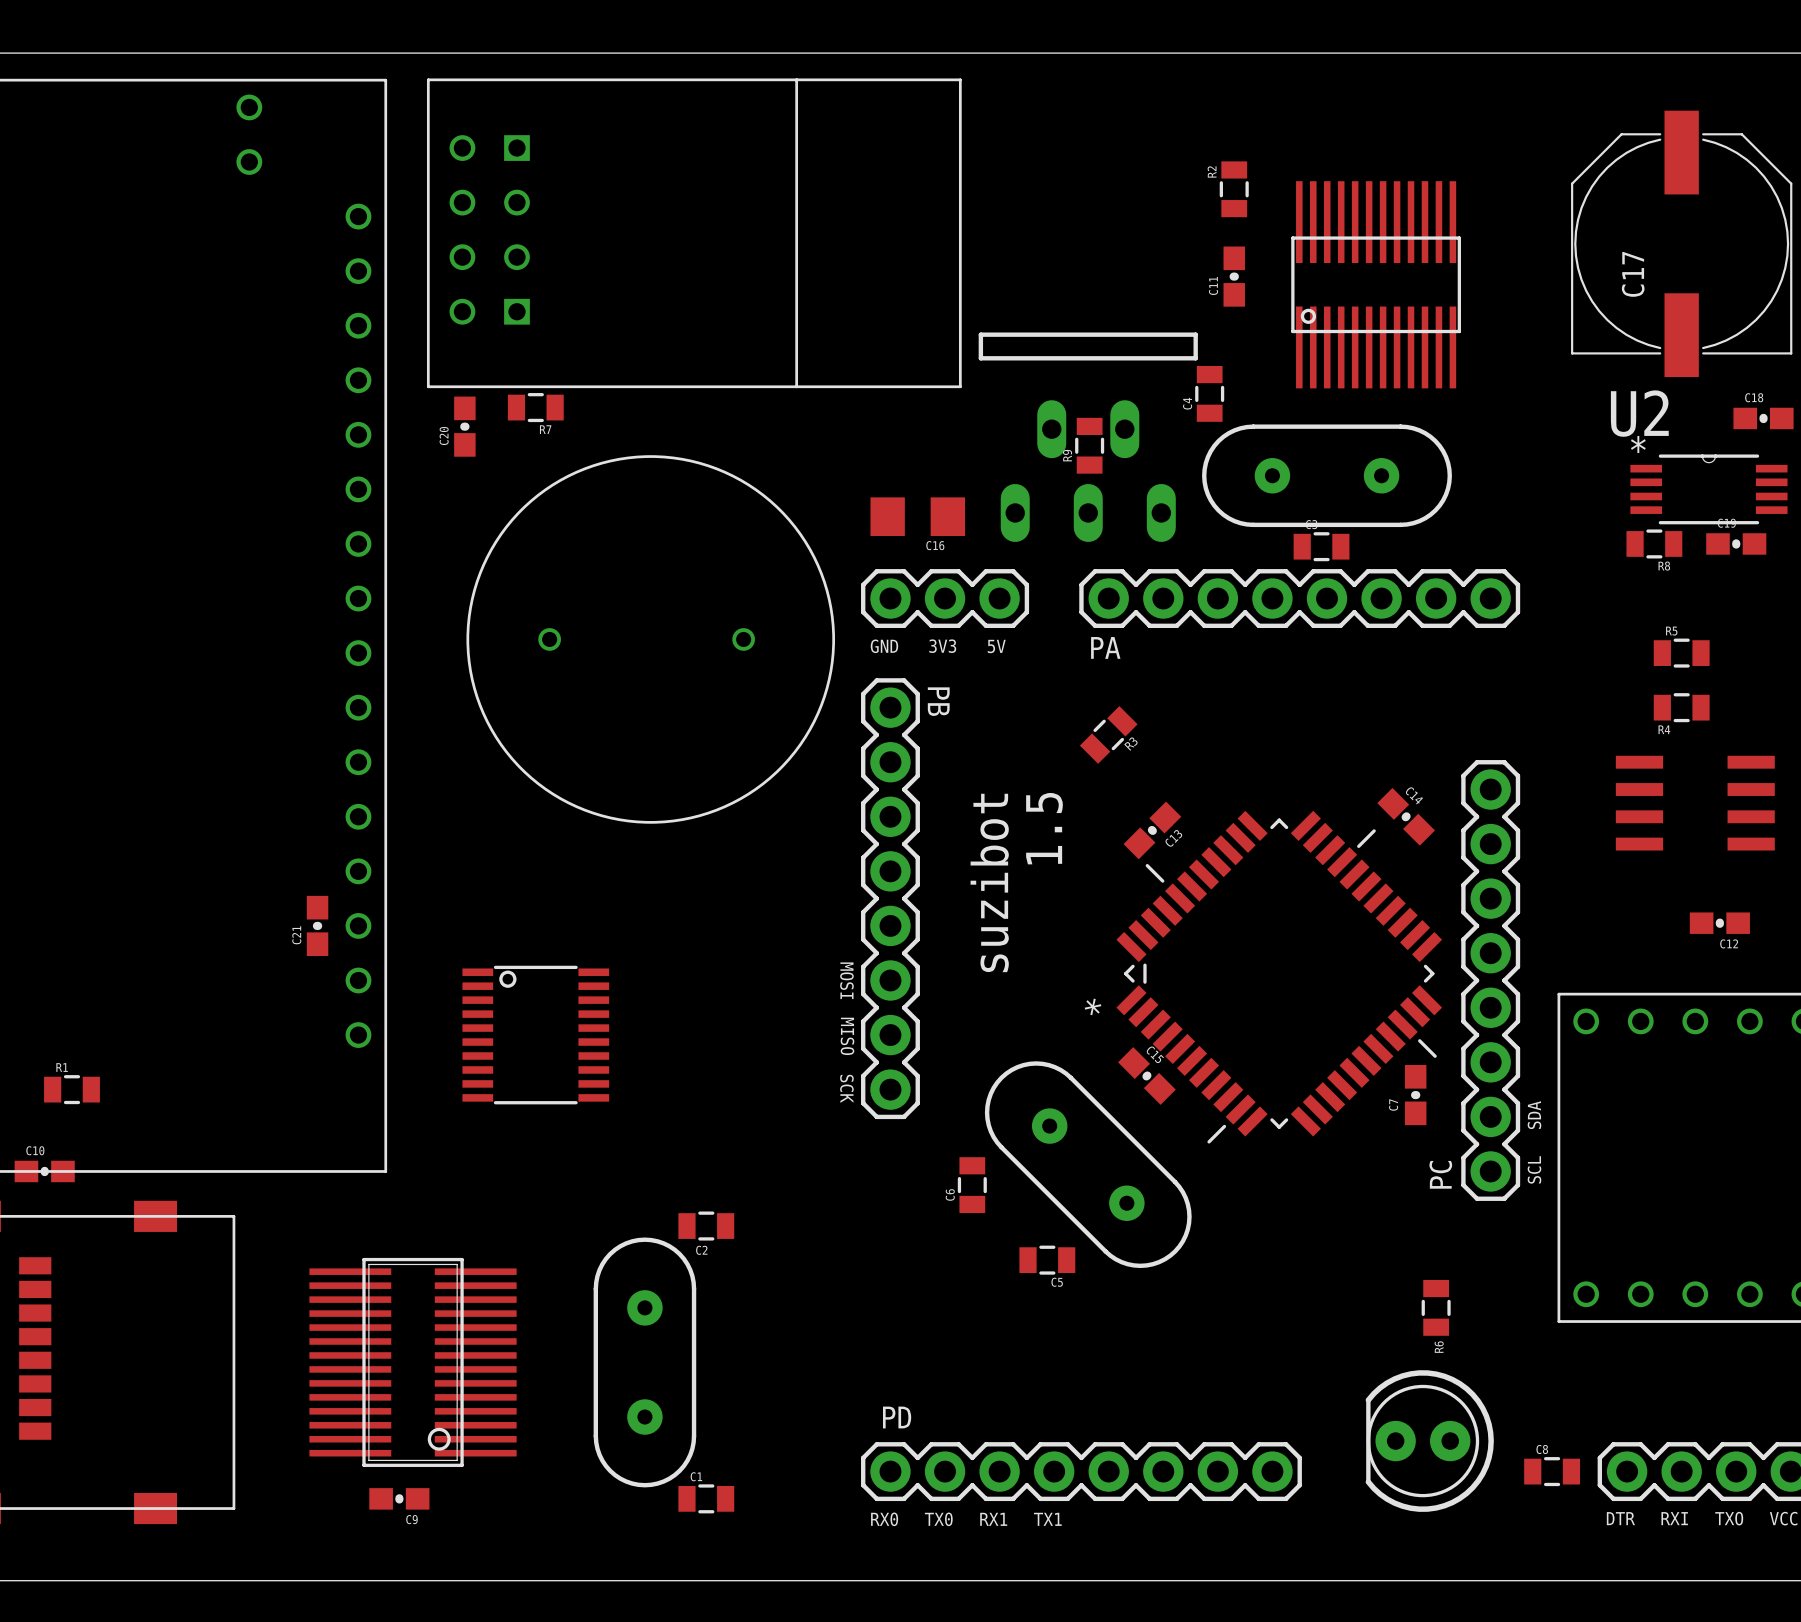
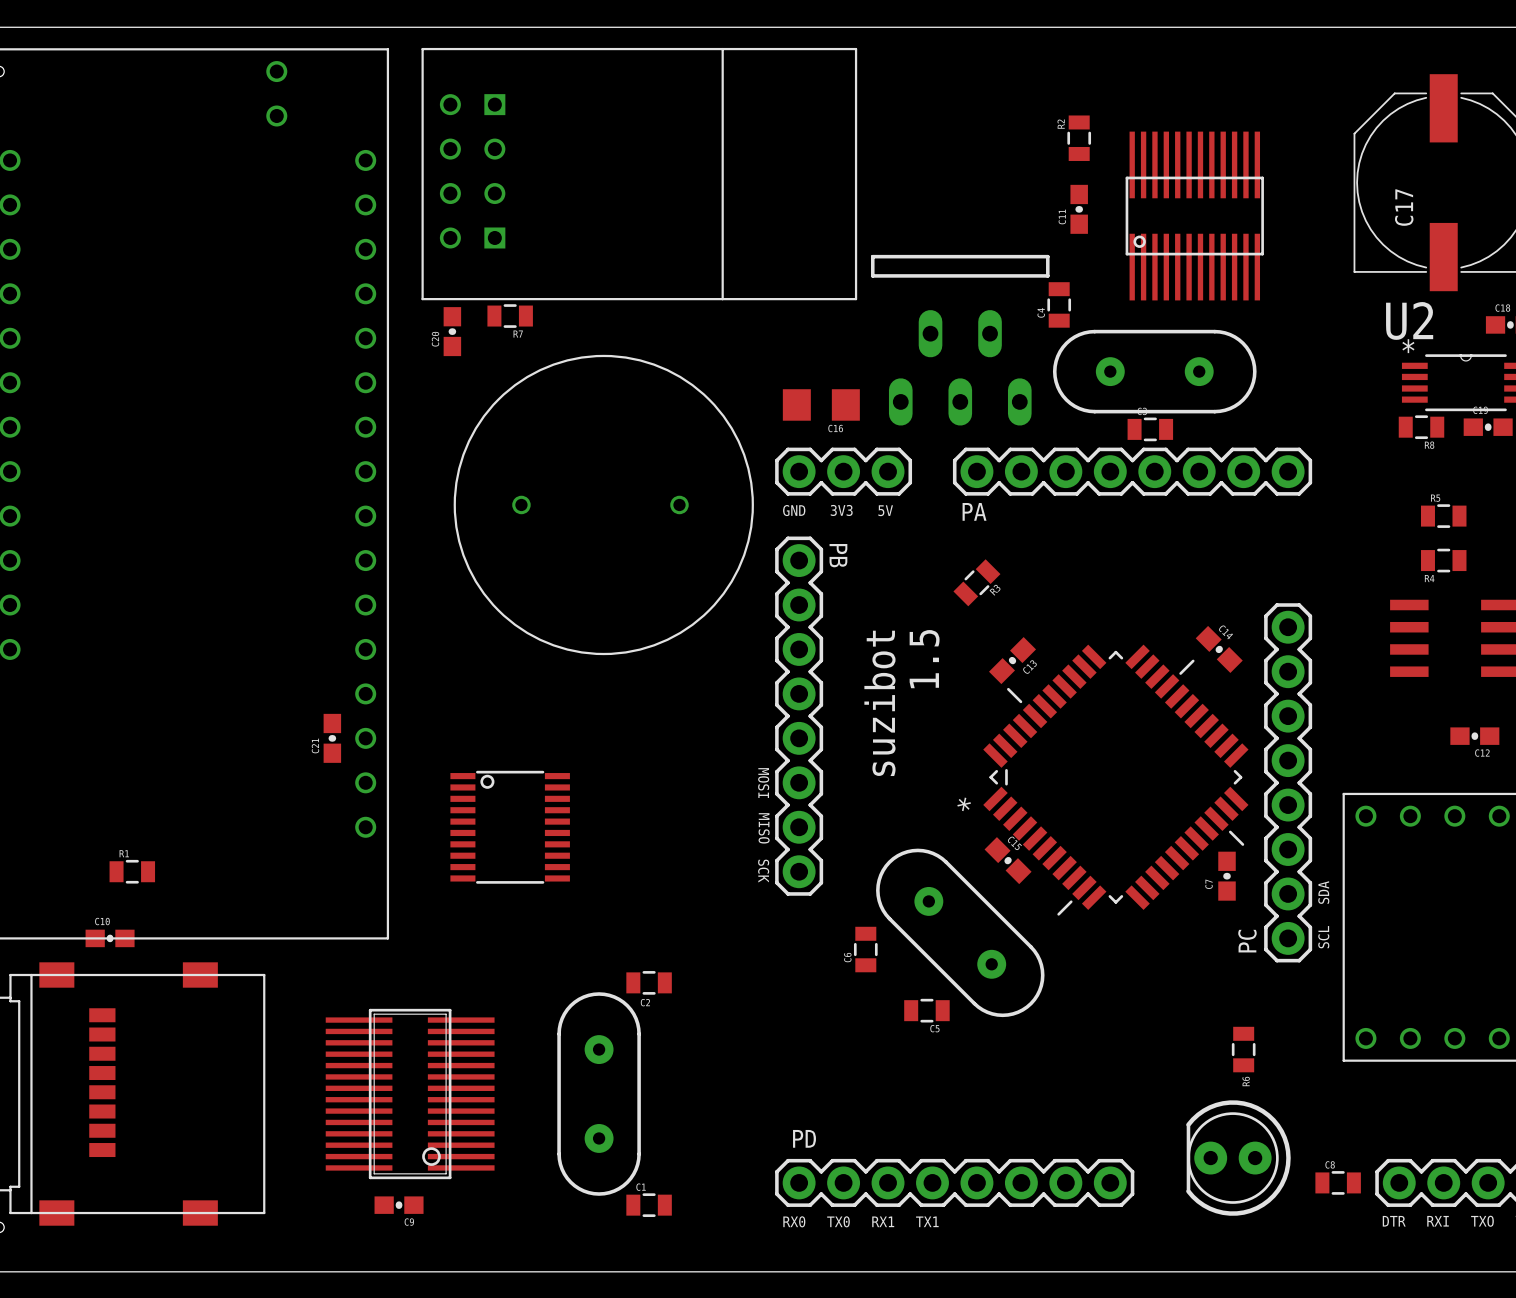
R9: (1089, 445) -> none

